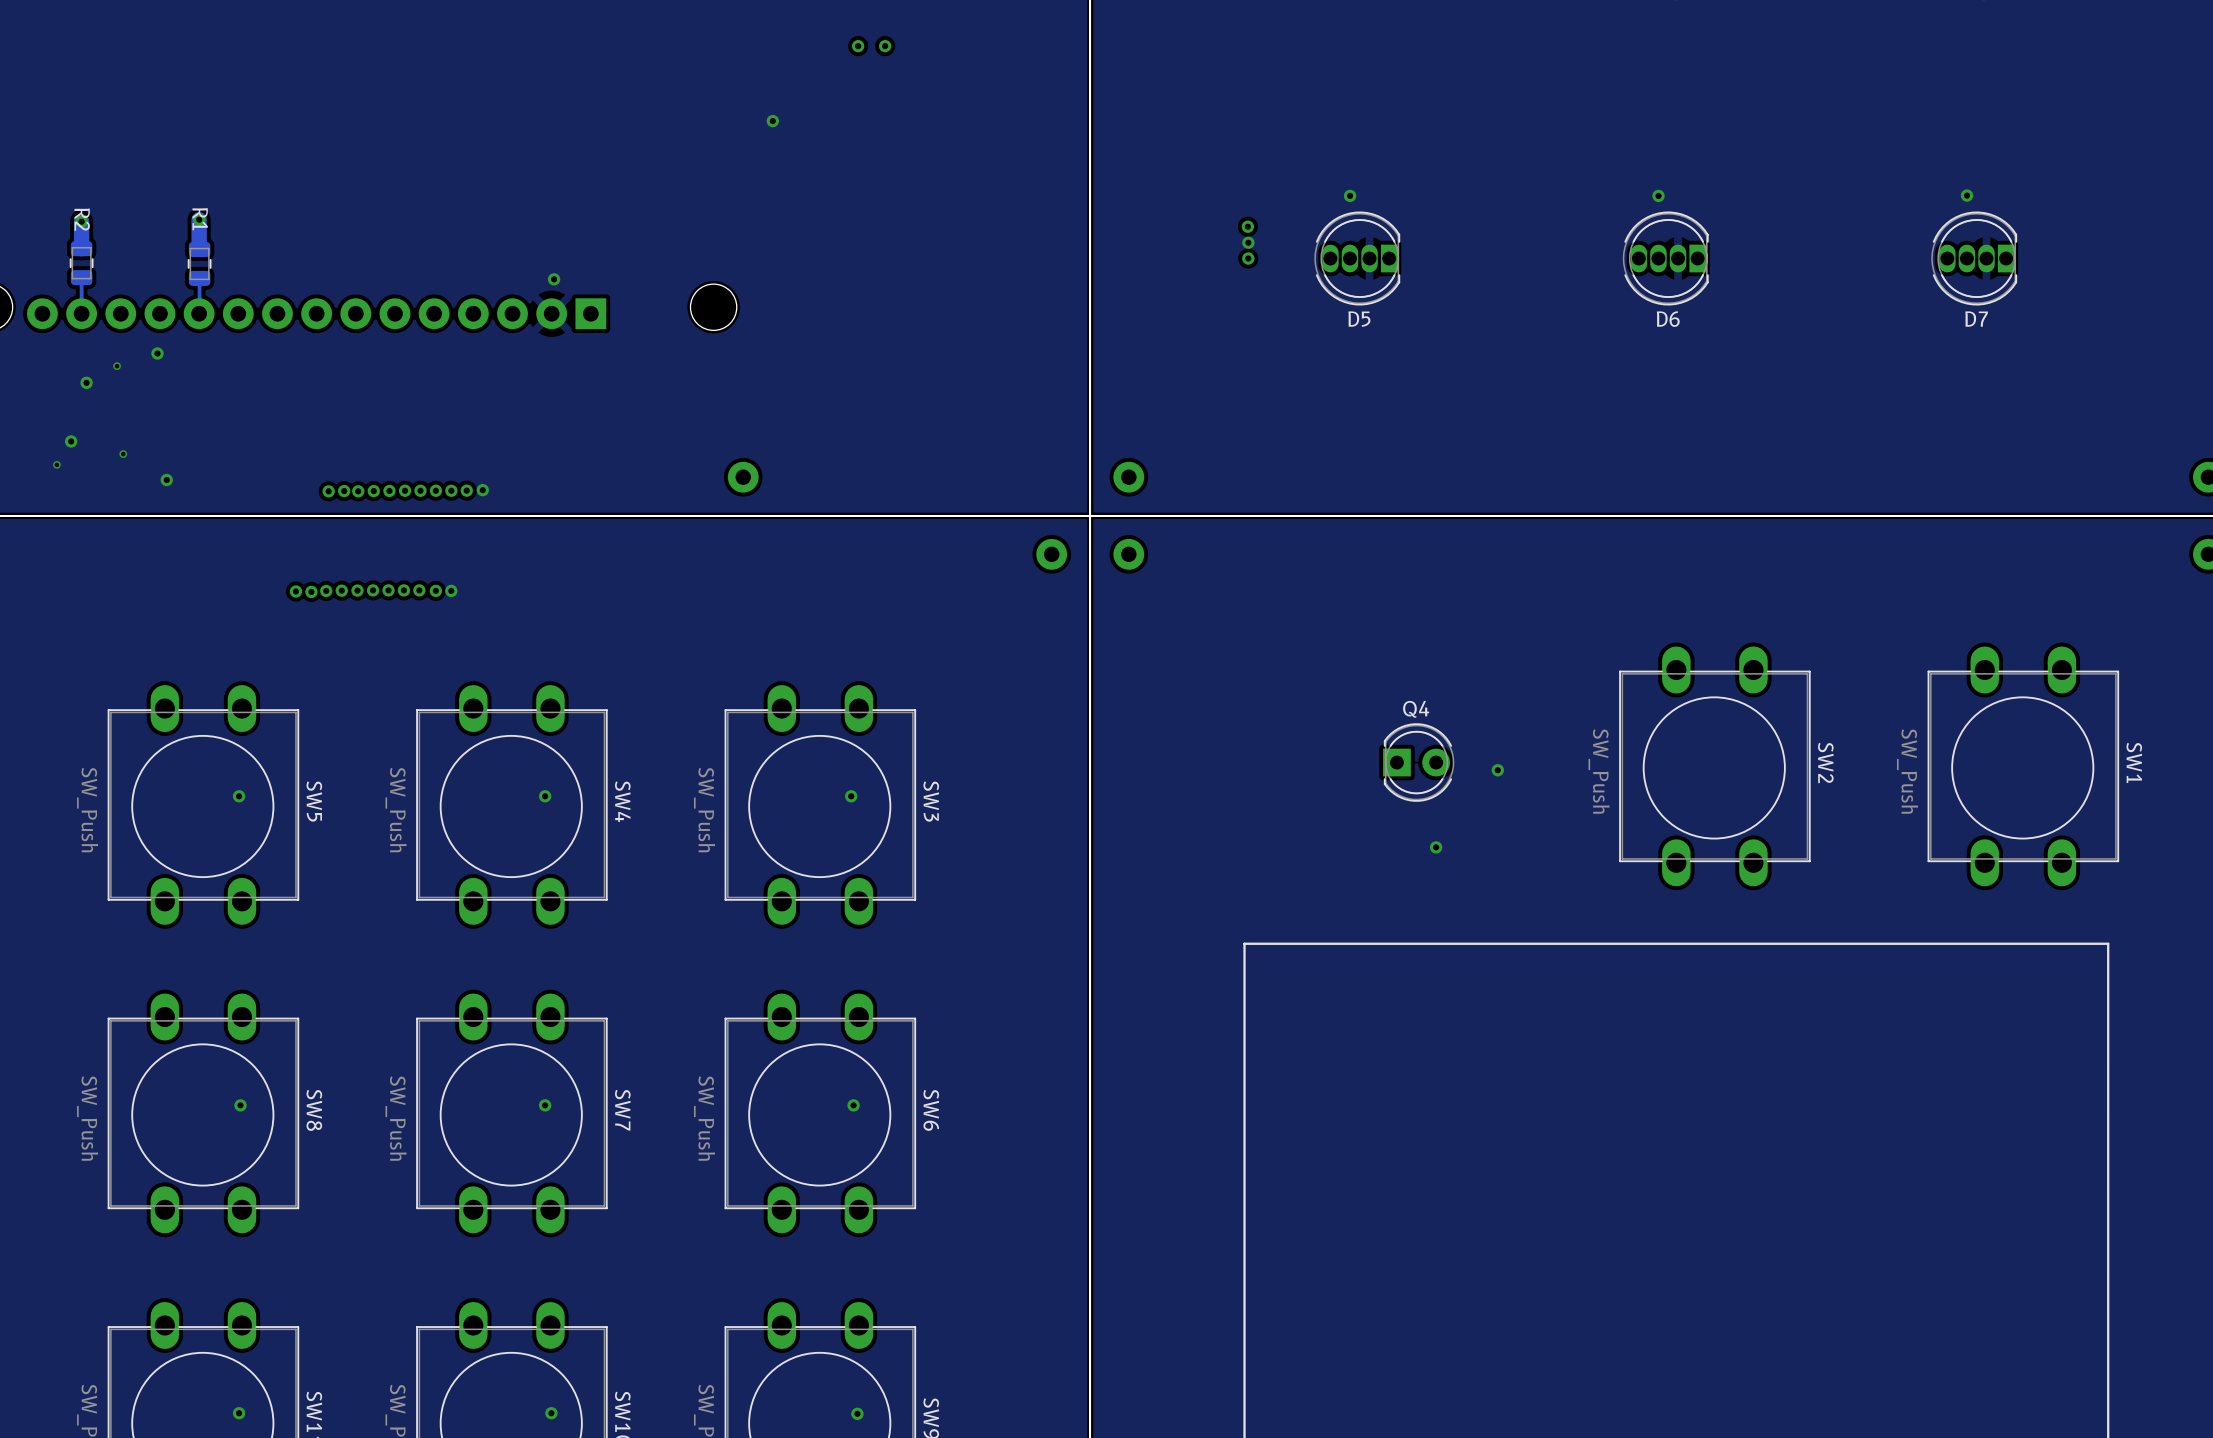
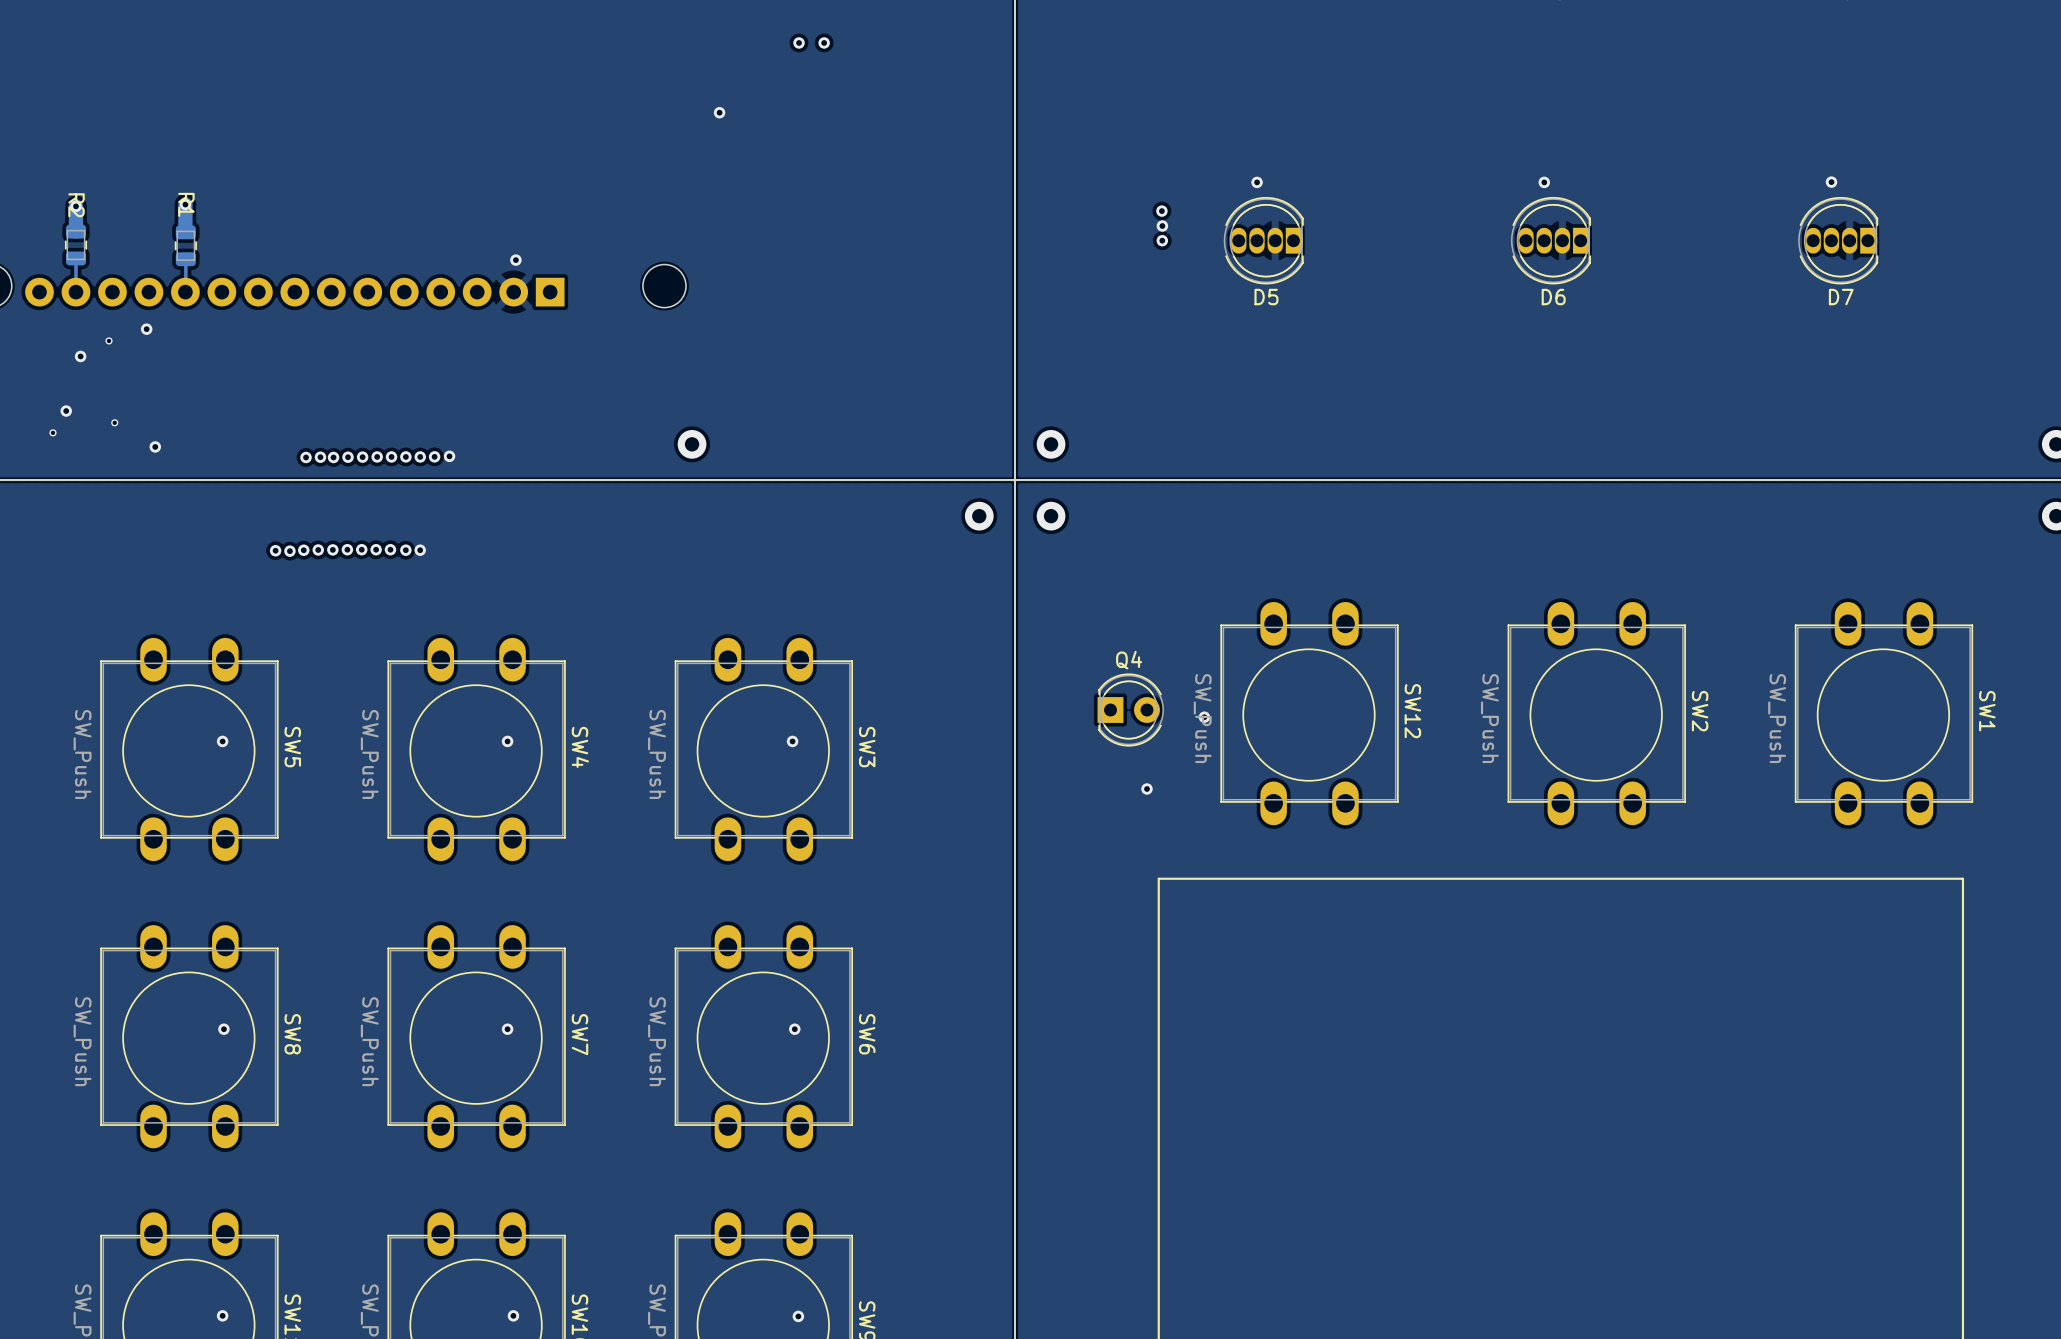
Q4 position: (1418, 762) -> (1130, 710)
SW12: none -> SW_Push (1309, 713)
via: none -> (1204, 717)
via: (1497, 770) -> none
via: none -> (1146, 788)
via: (1436, 847) -> none

